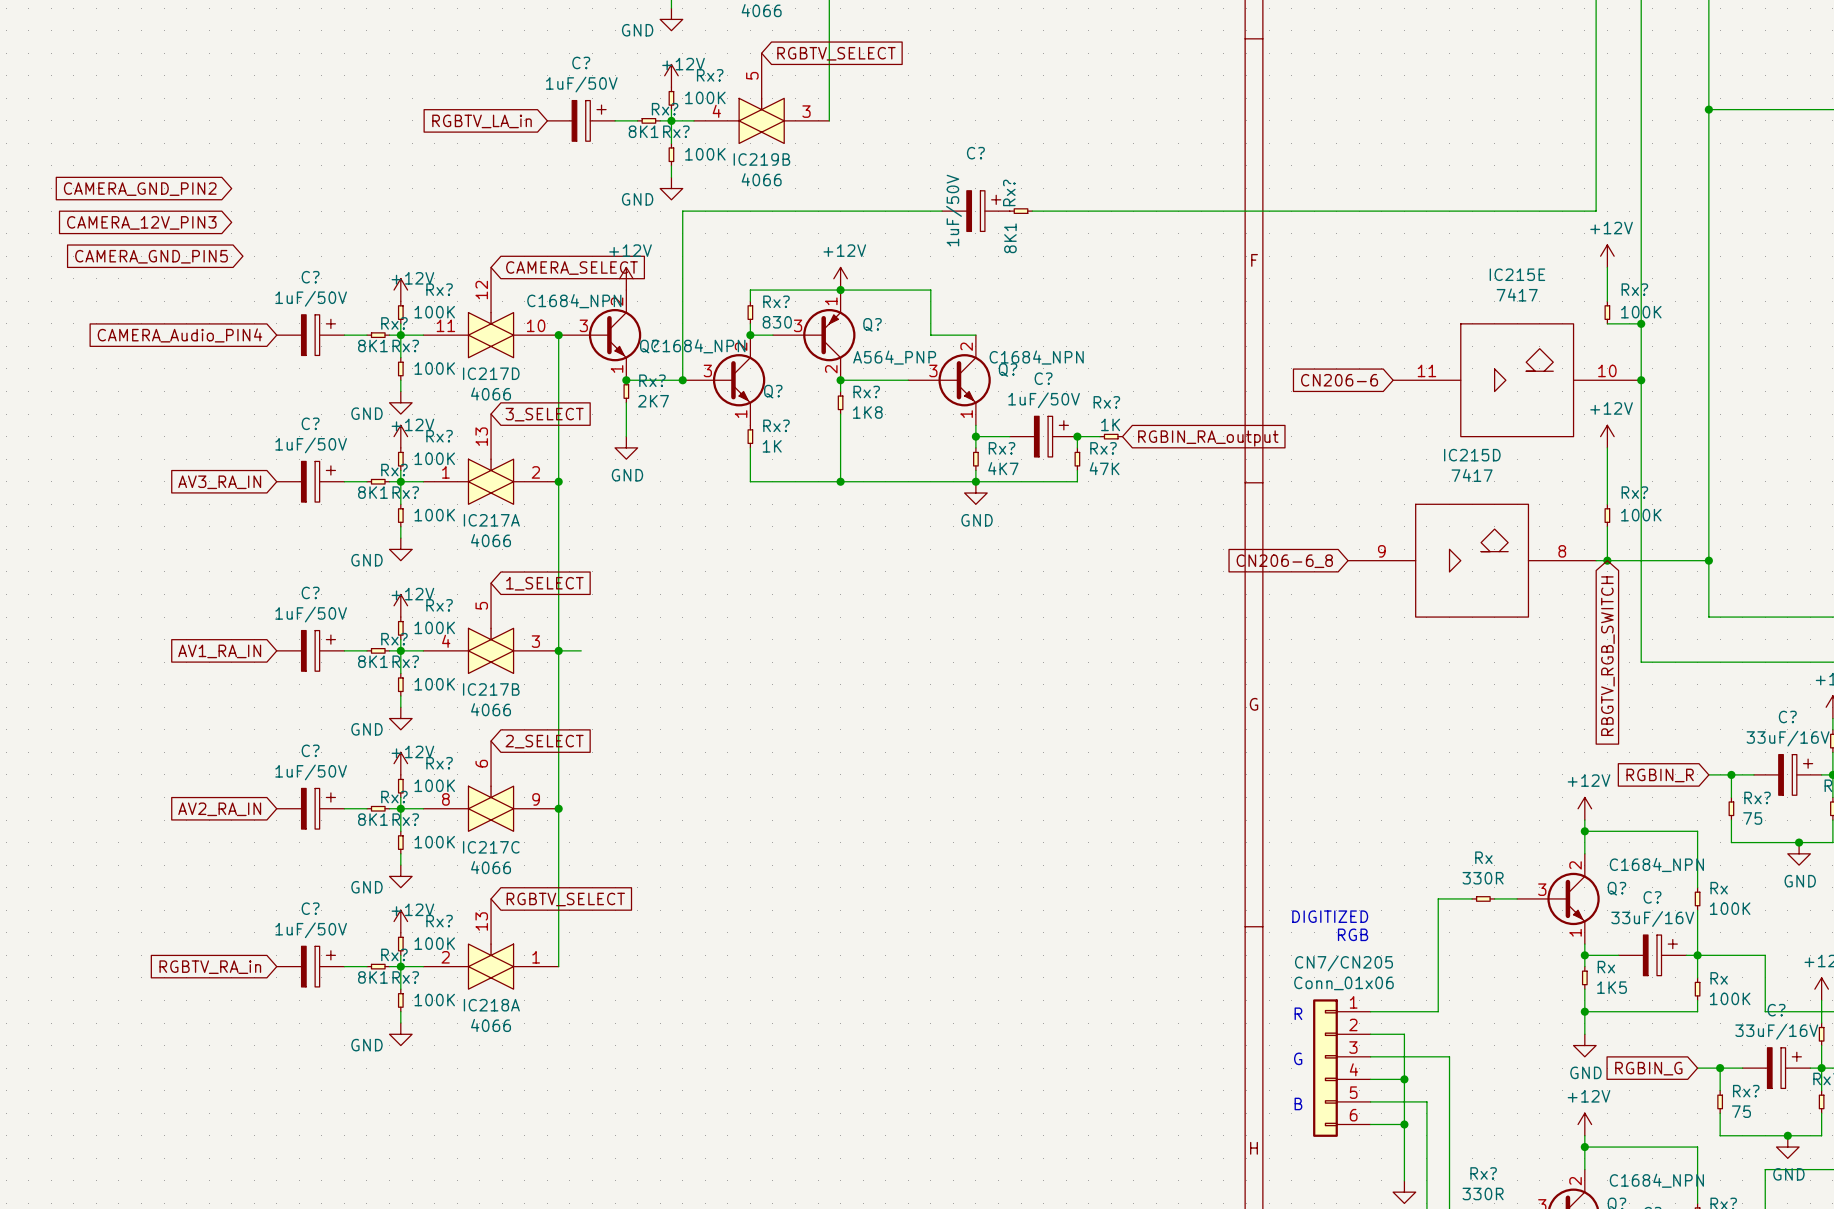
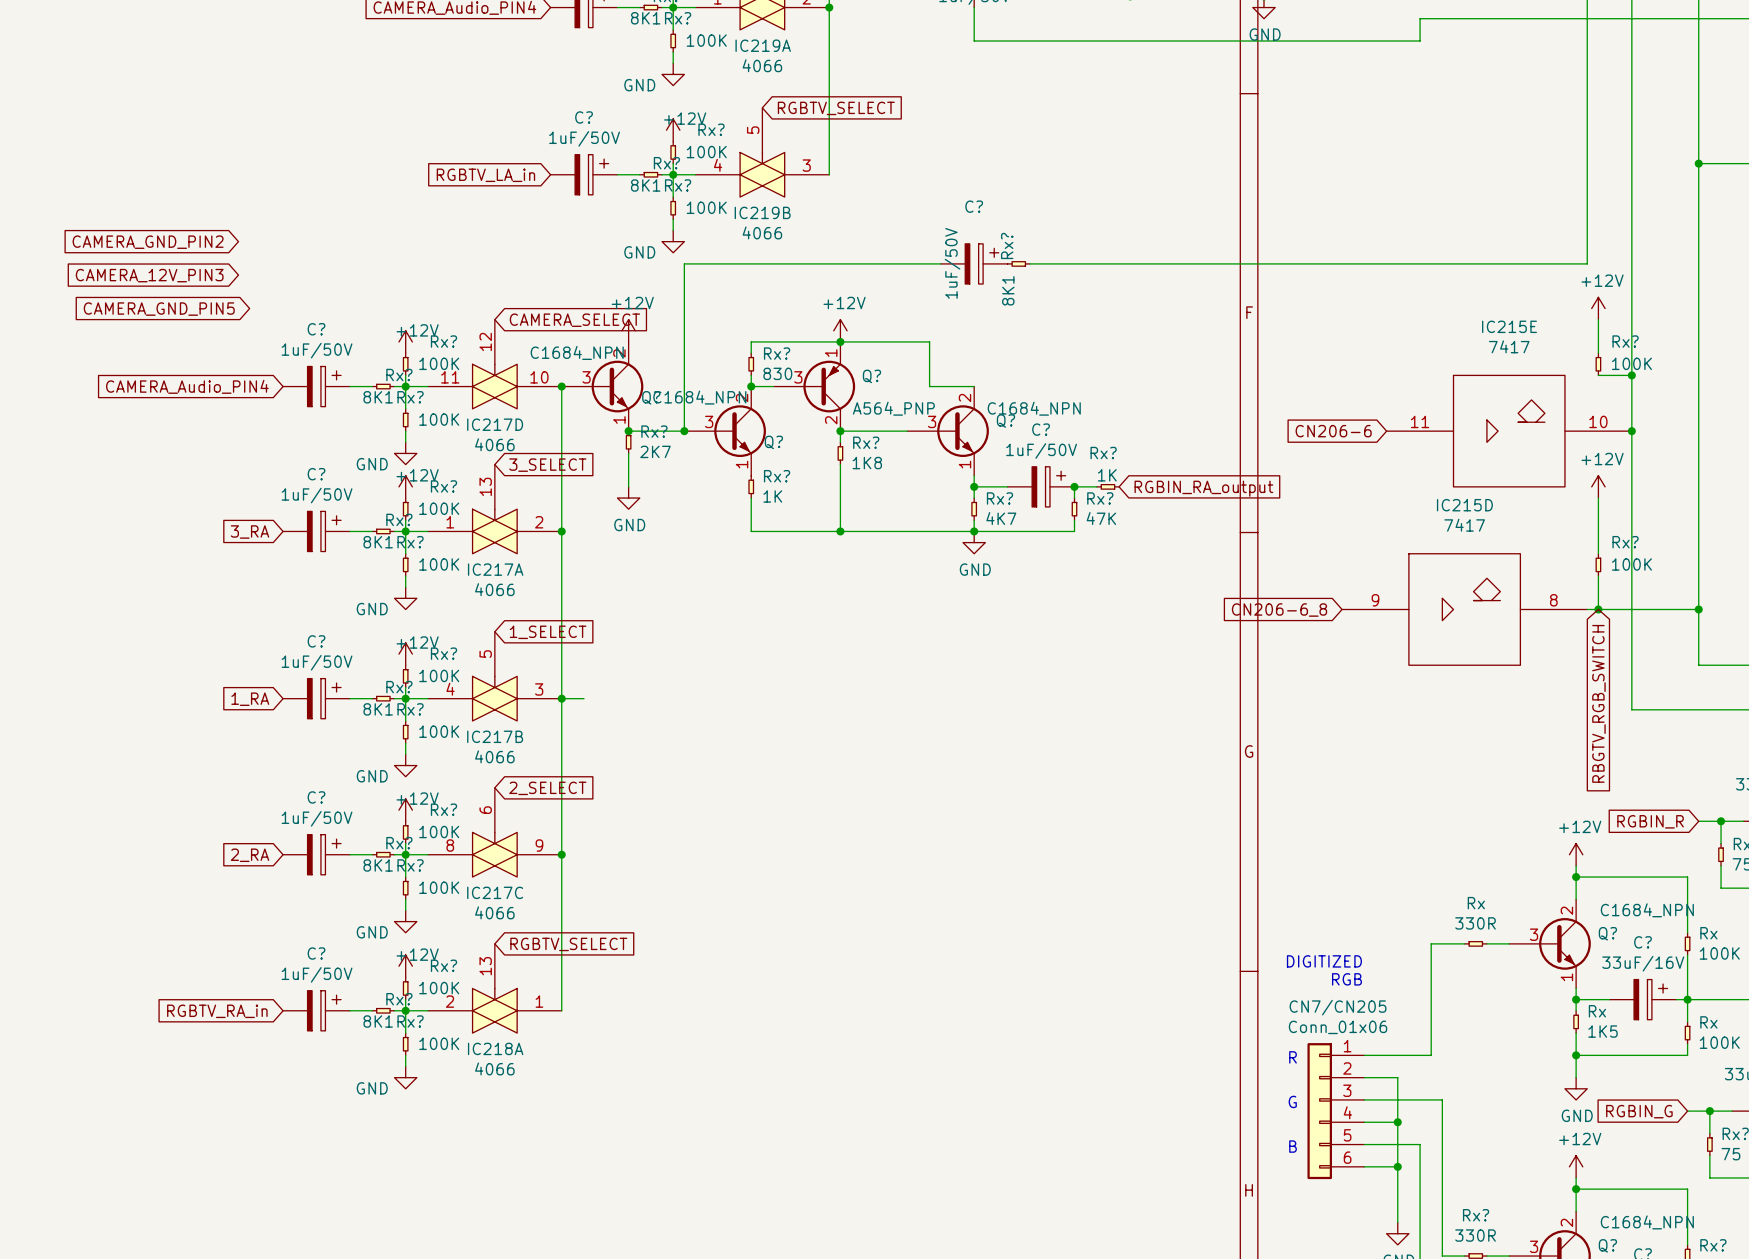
global label: AV3_RA_IN (219, 482) -> 3_RA (250, 531)
global label: AV1_RA_IN (219, 651) -> 1_RA (250, 699)
global label: AV2_RA_IN (219, 809) -> 2_RA (250, 855)

